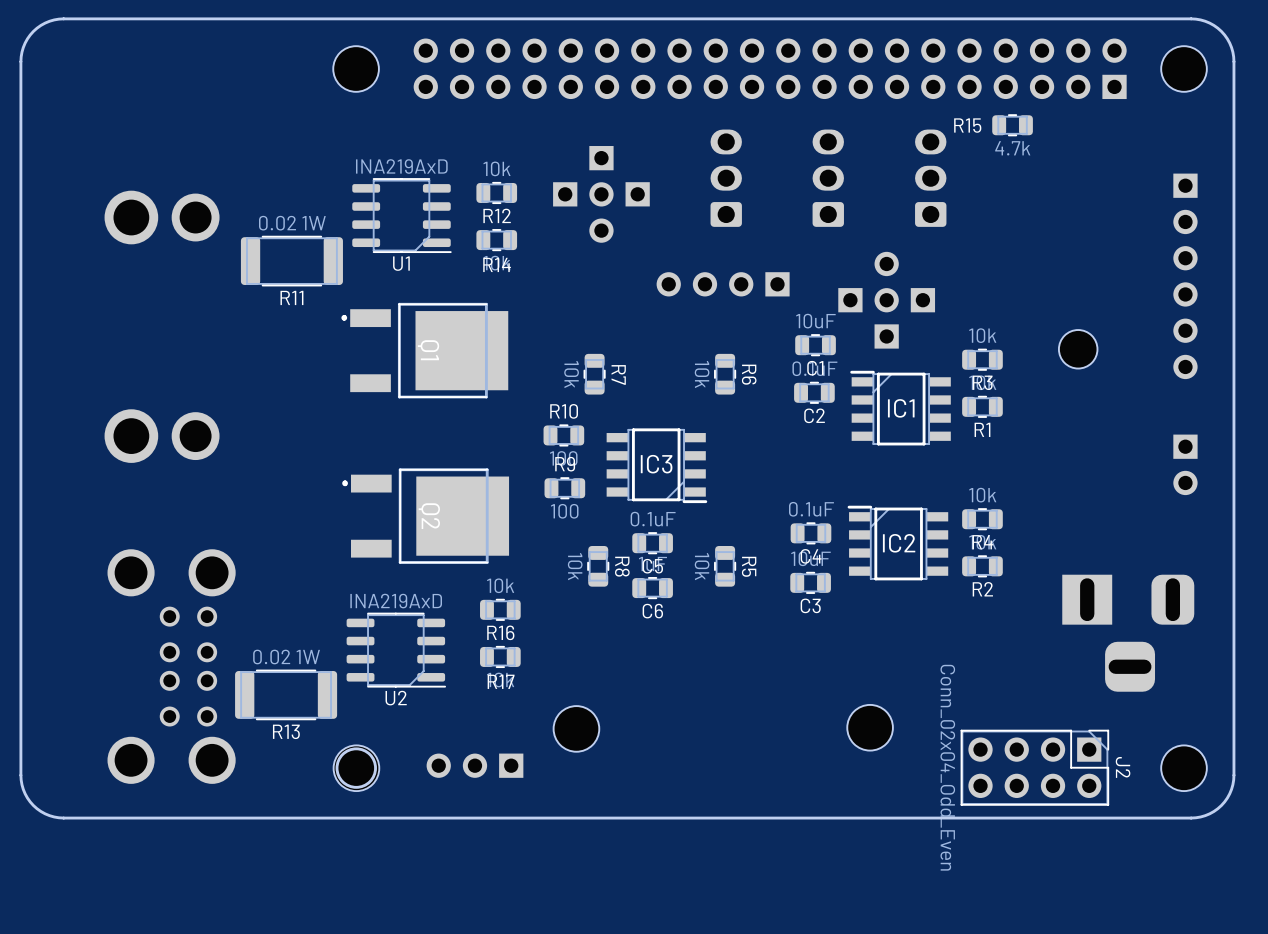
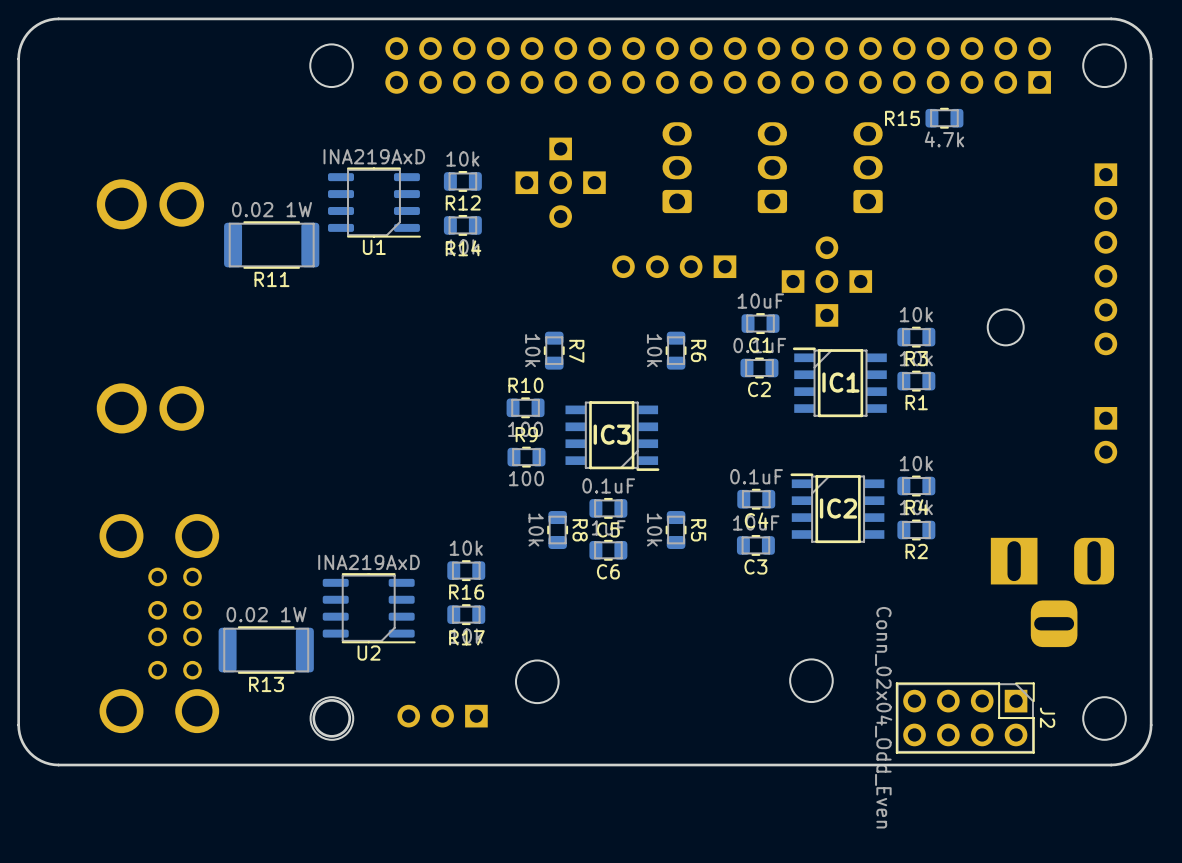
part: (424, 350) -> none
part: (425, 516) -> none

